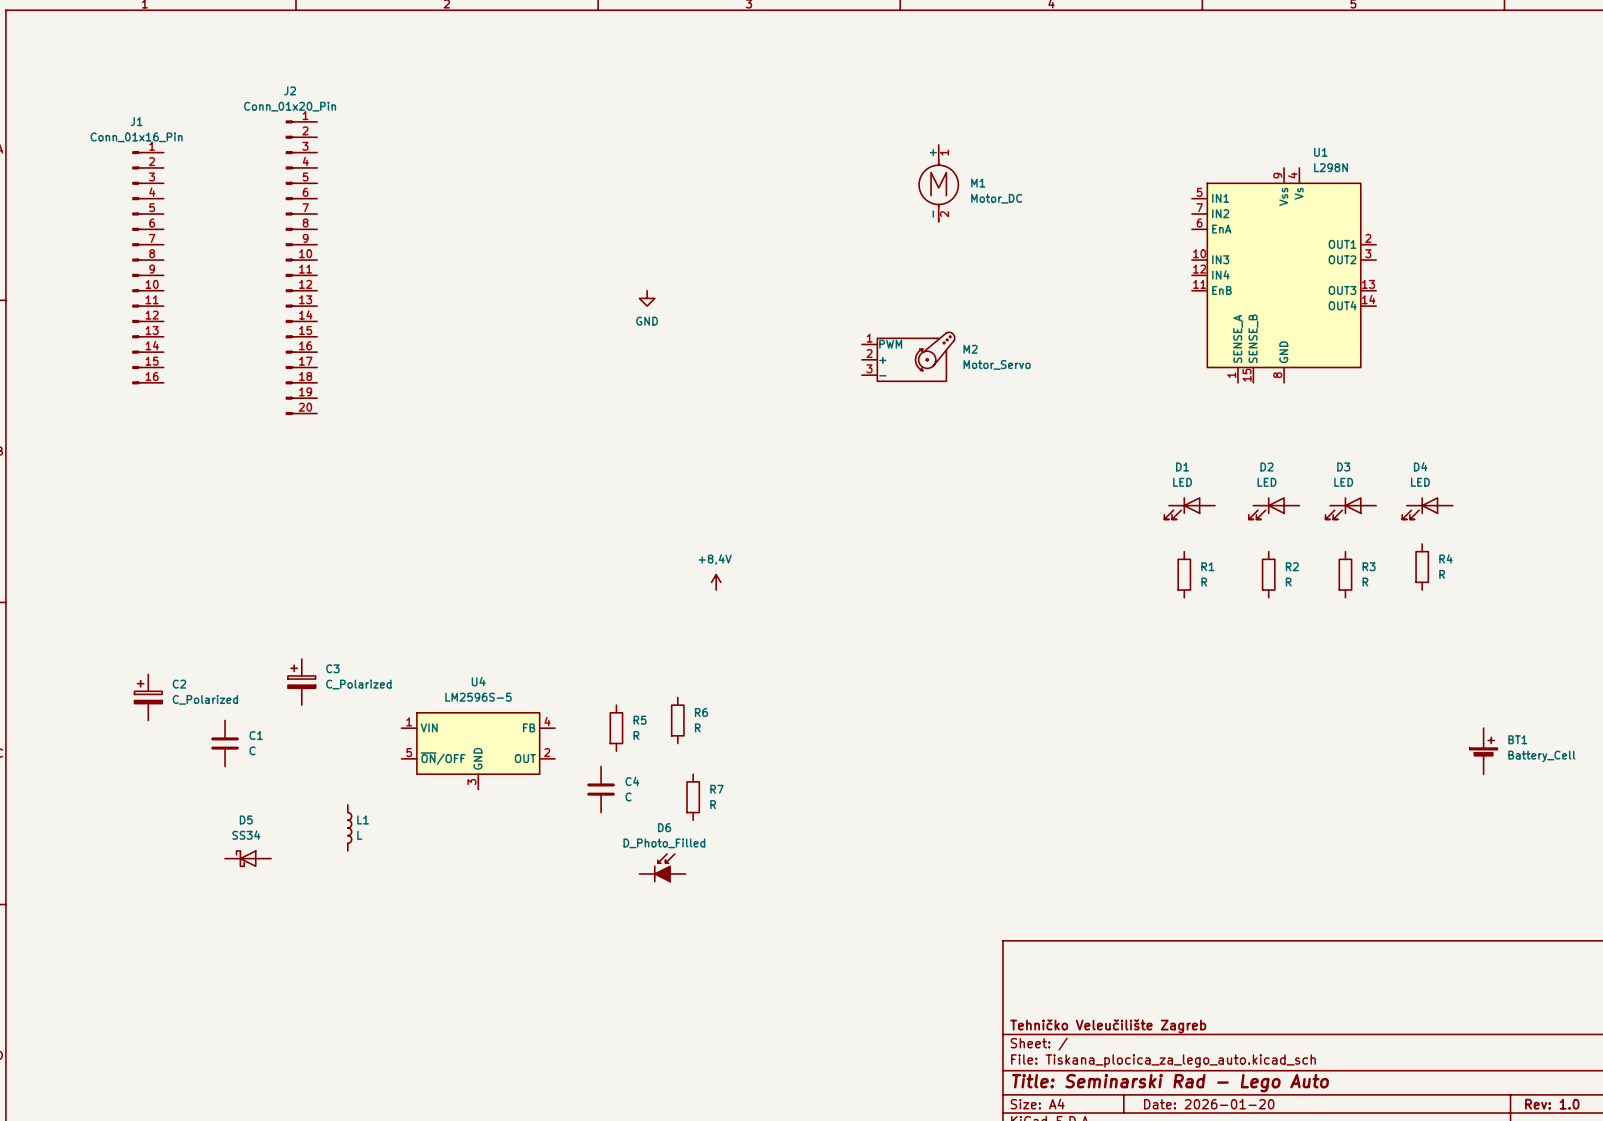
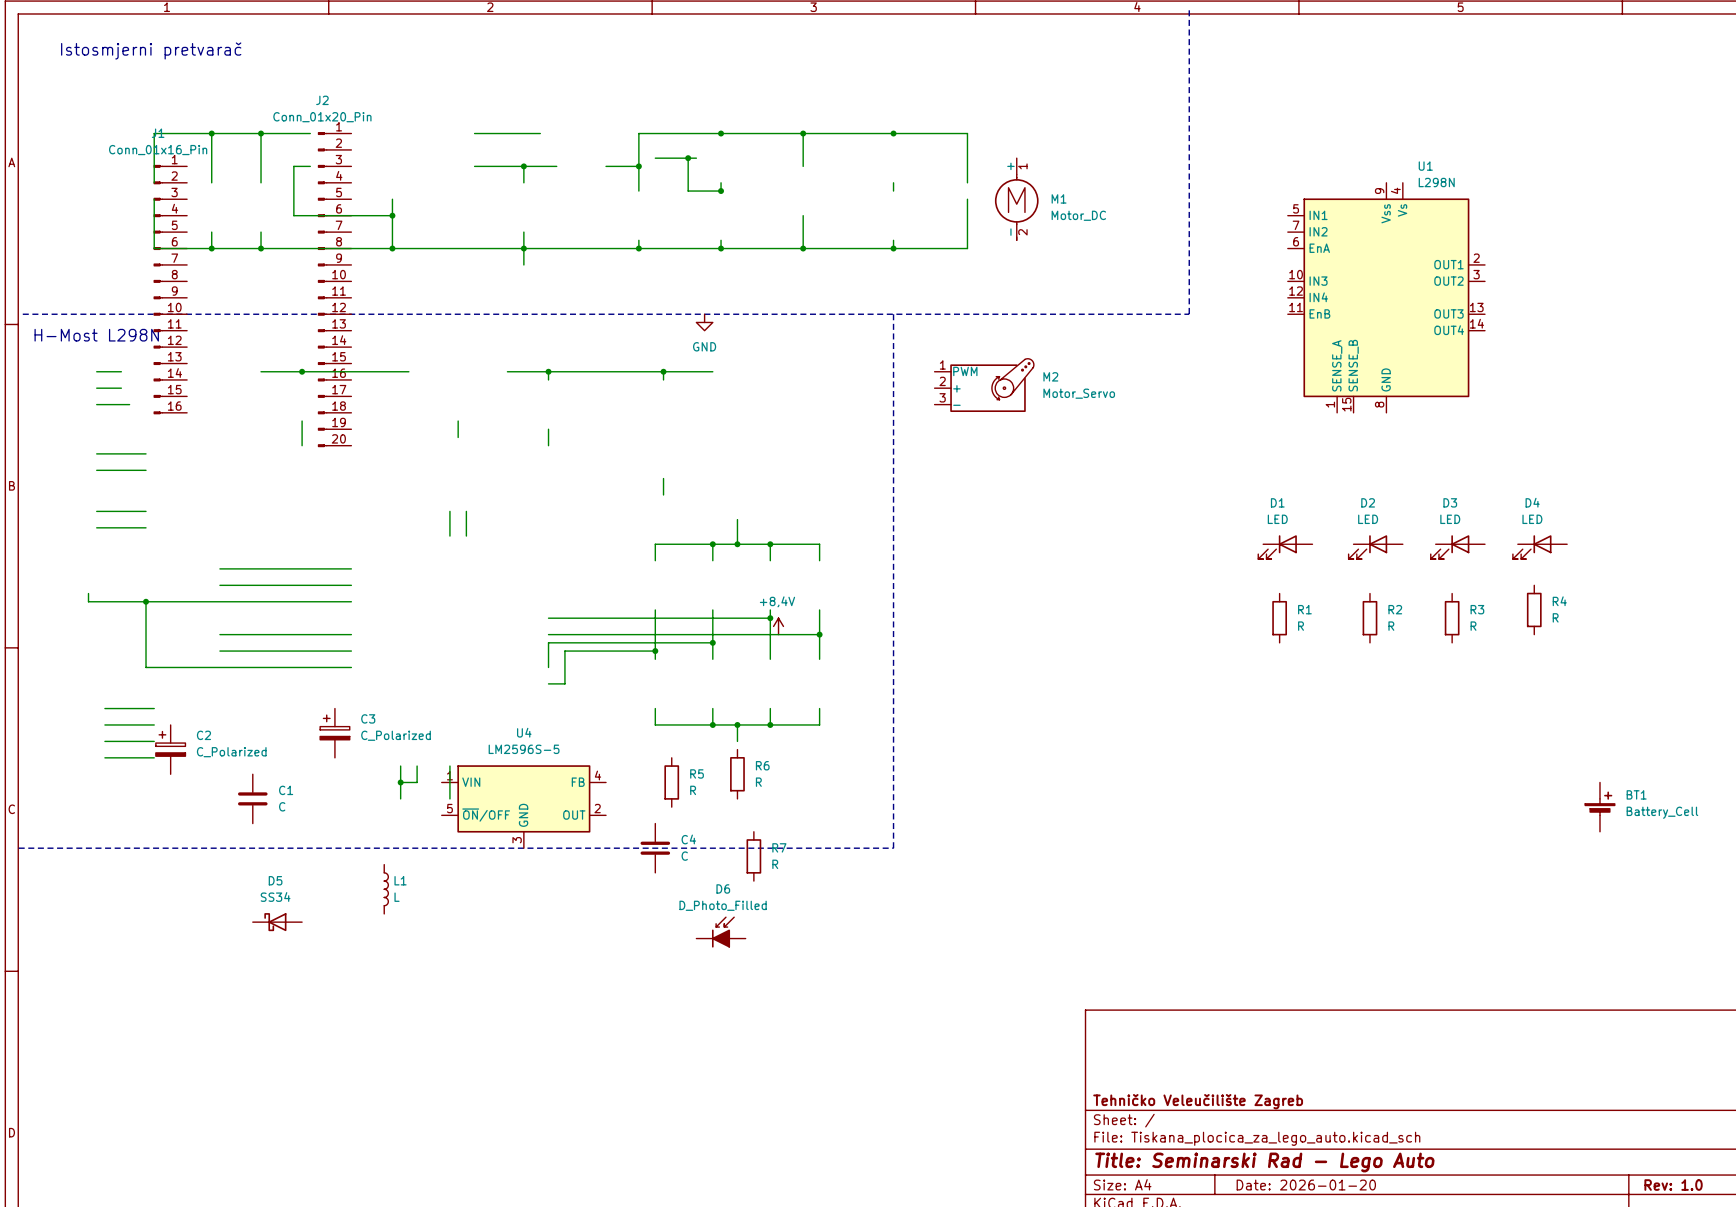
line: none -> (1189, 10) (1189, 314) (22, 314)
text: none -> Istosmjerni pretvarač (151, 50)
wire: none -> (211, 133) (211, 182)
junction: none -> (211, 133)
wire: none -> (261, 133) (261, 182)
junction: none -> (261, 133)
wire: none -> (310, 133) (154, 133) (154, 182)
wire: none -> (474, 133) (540, 133)
junction: none -> (721, 133)
wire: none -> (803, 133) (803, 166)
junction: none -> (803, 133)
junction: none -> (893, 133)
wire: none -> (655, 158) (696, 158)
wire: none -> (688, 158) (688, 191) (721, 191) (721, 182)
junction: none -> (688, 158)
wire: none -> (310, 166) (293, 166) (293, 215) (392, 215)
wire: none -> (474, 166) (556, 166)
wire: none -> (523, 166) (523, 182)
junction: none -> (523, 166)
wire: none -> (606, 166) (638, 166)
junction: none -> (638, 166)
wire: none -> (893, 182) (893, 191)
wire: none -> (967, 182) (967, 133) (638, 133) (638, 191)
junction: none -> (721, 191)
wire: none -> (154, 199) (154, 248) (967, 248) (967, 199)
wire: none -> (392, 199) (392, 248)
junction: none -> (392, 215)
wire: none -> (803, 215) (803, 248)
wire: none -> (211, 232) (211, 248)
wire: none -> (261, 232) (261, 248)
wire: none -> (523, 232) (523, 264)
wire: none -> (638, 240) (638, 248)
wire: none -> (721, 240) (721, 248)
wire: none -> (893, 240) (893, 248)
junction: none -> (211, 248)
junction: none -> (261, 248)
junction: none -> (392, 248)
junction: none -> (523, 248)
junction: none -> (638, 248)
junction: none -> (721, 248)
junction: none -> (803, 248)
junction: none -> (893, 248)
line: none -> (893, 314) (893, 848) (18, 848)
text: none -> H-Most L298N (96, 335)
wire: none -> (96, 371) (121, 371)
wire: none -> (261, 371) (408, 371)
junction: none -> (302, 371)
wire: none -> (507, 371) (712, 371)
wire: none -> (548, 371) (548, 379)
junction: none -> (548, 371)
wire: none -> (663, 371) (663, 379)
junction: none -> (663, 371)
wire: none -> (96, 388) (121, 388)
wire: none -> (96, 404) (129, 404)
wire: none -> (302, 421) (302, 445)
wire: none -> (458, 421) (458, 437)
wire: none -> (548, 429) (548, 445)
wire: none -> (96, 453) (146, 453)
wire: none -> (96, 470) (146, 470)
wire: none -> (663, 478) (663, 494)
wire: none -> (96, 511) (146, 511)
wire: none -> (449, 511) (449, 536)
wire: none -> (466, 511) (466, 536)
wire: none -> (737, 519) (737, 544)
wire: none -> (96, 527) (146, 527)
wire: none -> (712, 544) (712, 560)
junction: none -> (712, 544)
junction: none -> (737, 544)
wire: none -> (770, 544) (770, 560)
junction: none -> (770, 544)
wire: none -> (655, 560) (655, 544) (819, 544) (819, 560)
wire: none -> (219, 568) (351, 568)
wire: none -> (219, 585) (351, 585)
wire: none -> (88, 593) (88, 601) (351, 601)
wire: none -> (146, 601) (146, 667) (351, 667)
junction: none -> (146, 601)
wire: none -> (655, 609) (655, 659)
wire: none -> (712, 609) (712, 659)
wire: none -> (770, 609) (770, 659)
wire: none -> (819, 609) (819, 659)
wire: none -> (548, 618) (770, 618)
junction: none -> (770, 618)
wire: none -> (219, 634) (351, 634)
wire: none -> (548, 634) (819, 634)
junction: none -> (819, 634)
wire: none -> (712, 642) (548, 642) (548, 667)
junction: none -> (712, 642)
wire: none -> (219, 651) (351, 651)
wire: none -> (655, 651) (564, 651) (564, 683) (548, 683)
junction: none -> (655, 651)
wire: none -> (104, 708) (154, 708)
wire: none -> (655, 708) (655, 724) (819, 724) (819, 708)
wire: none -> (712, 708) (712, 724)
wire: none -> (770, 708) (770, 724)
wire: none -> (104, 724) (154, 724)
junction: none -> (712, 724)
wire: none -> (737, 724) (737, 741)
junction: none -> (737, 724)
junction: none -> (770, 724)
wire: none -> (104, 741) (154, 741)
wire: none -> (104, 757) (154, 757)
wire: none -> (400, 766) (400, 798)
wire: none -> (417, 766) (417, 782) (400, 782)
wire: none -> (449, 766) (449, 798)
junction: none -> (400, 782)

